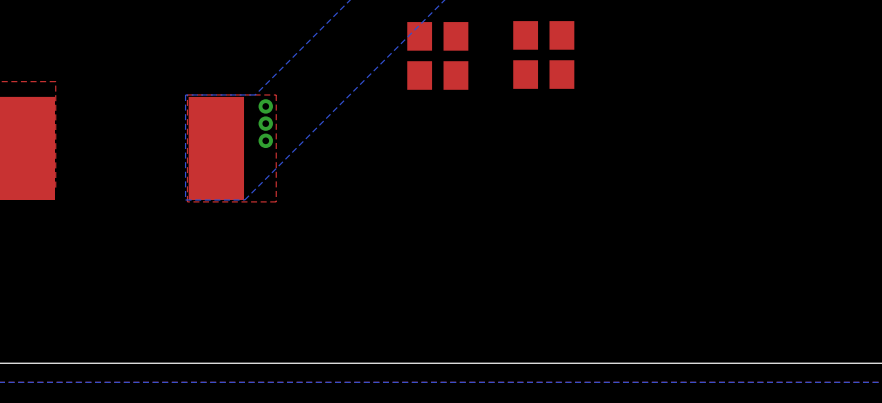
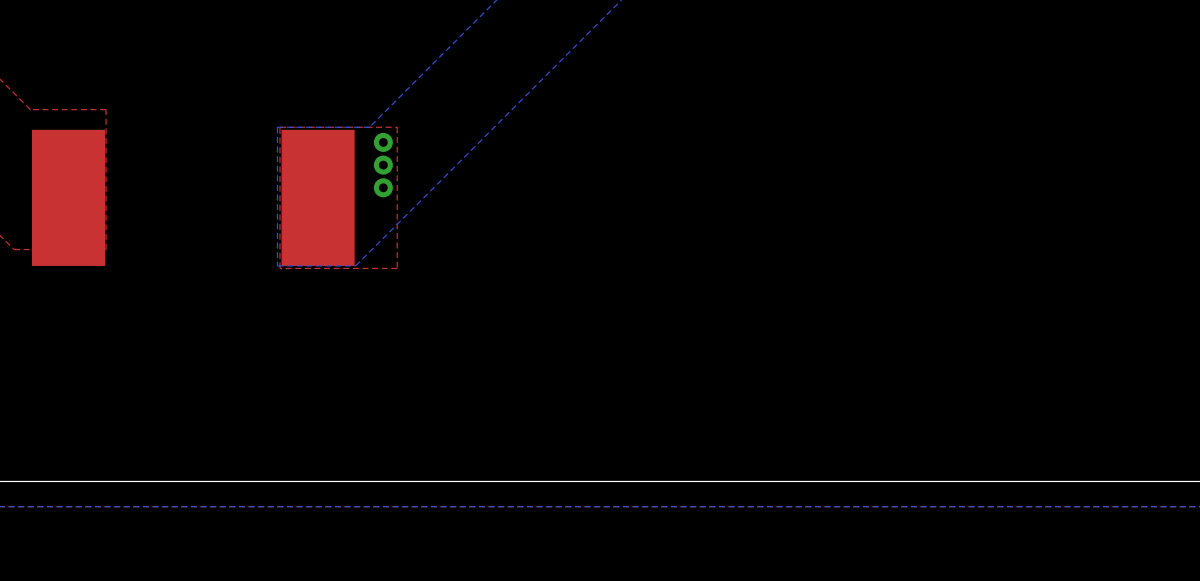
part: (543, 35) -> none
part: (437, 36) -> none
part: (543, 74) -> none
part: (437, 75) -> none

